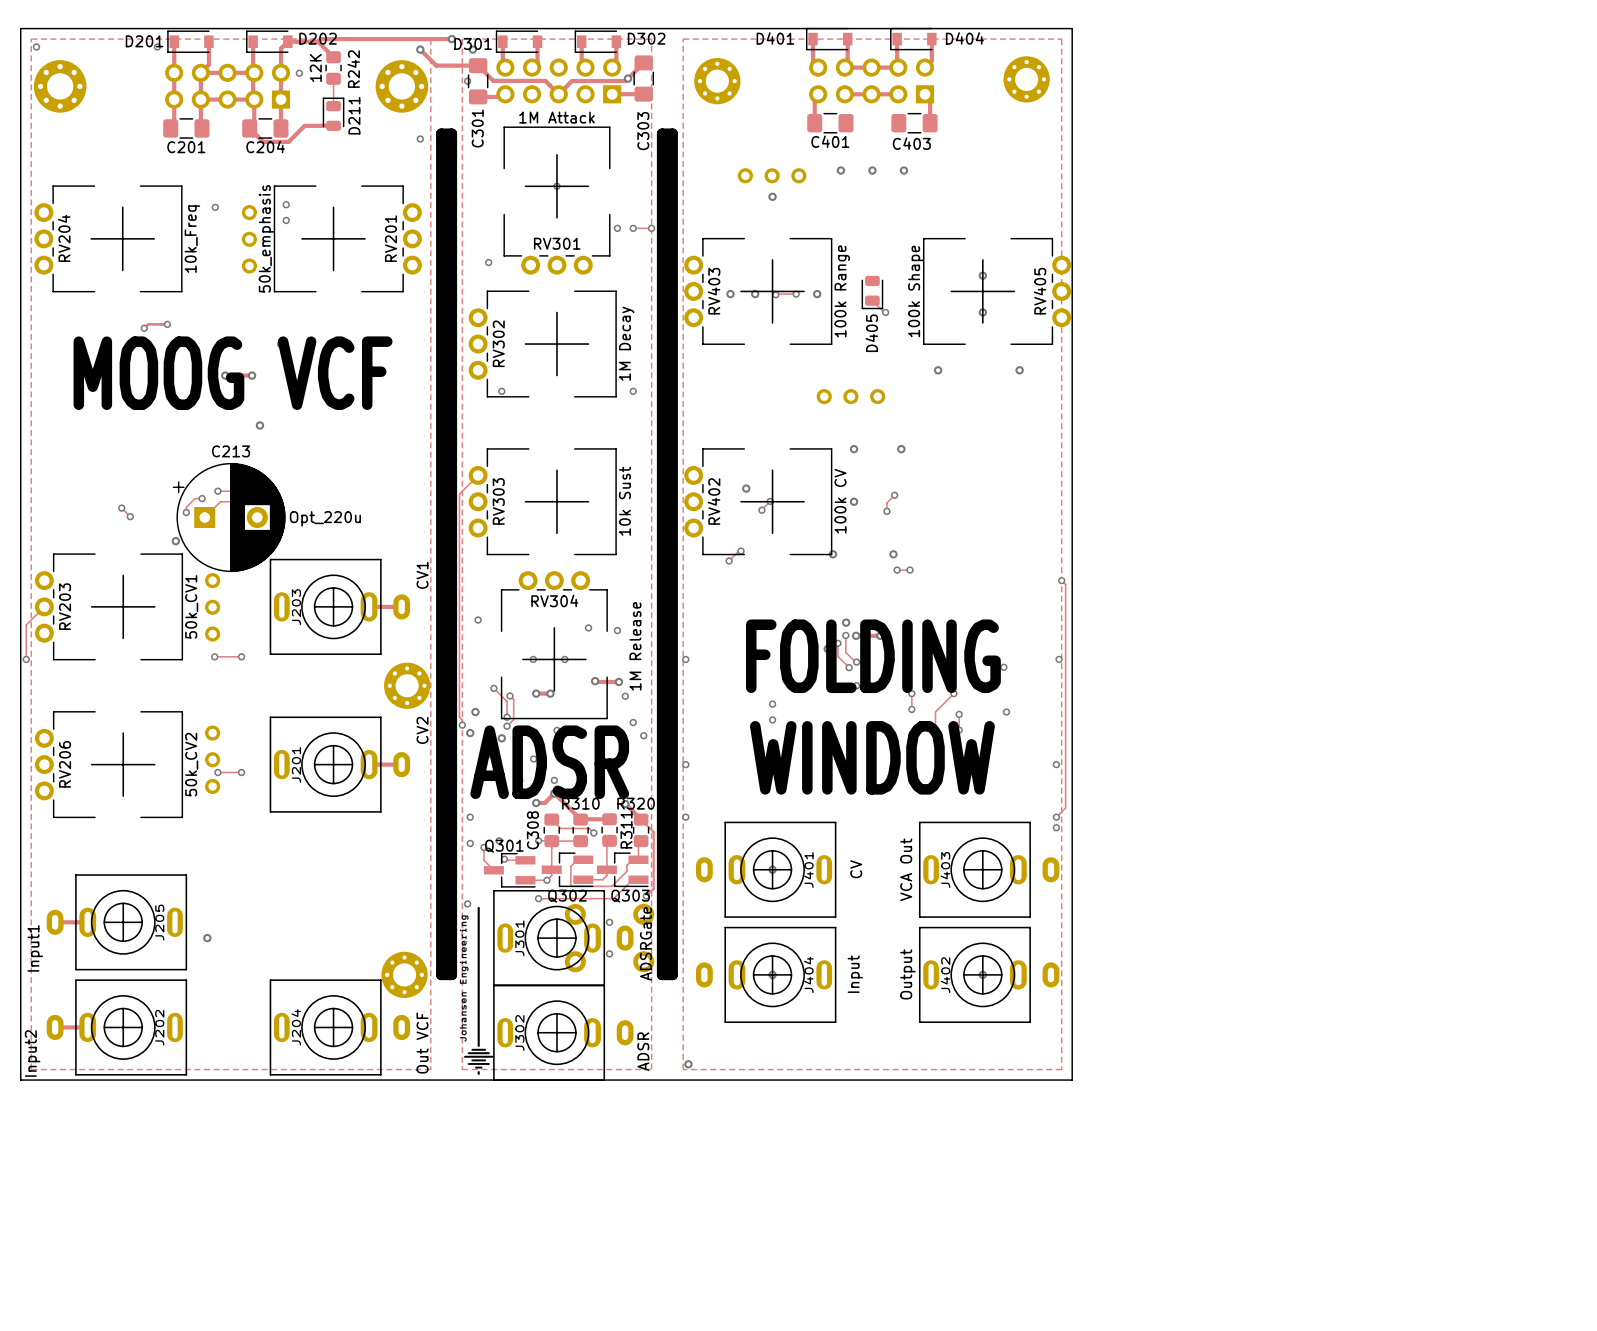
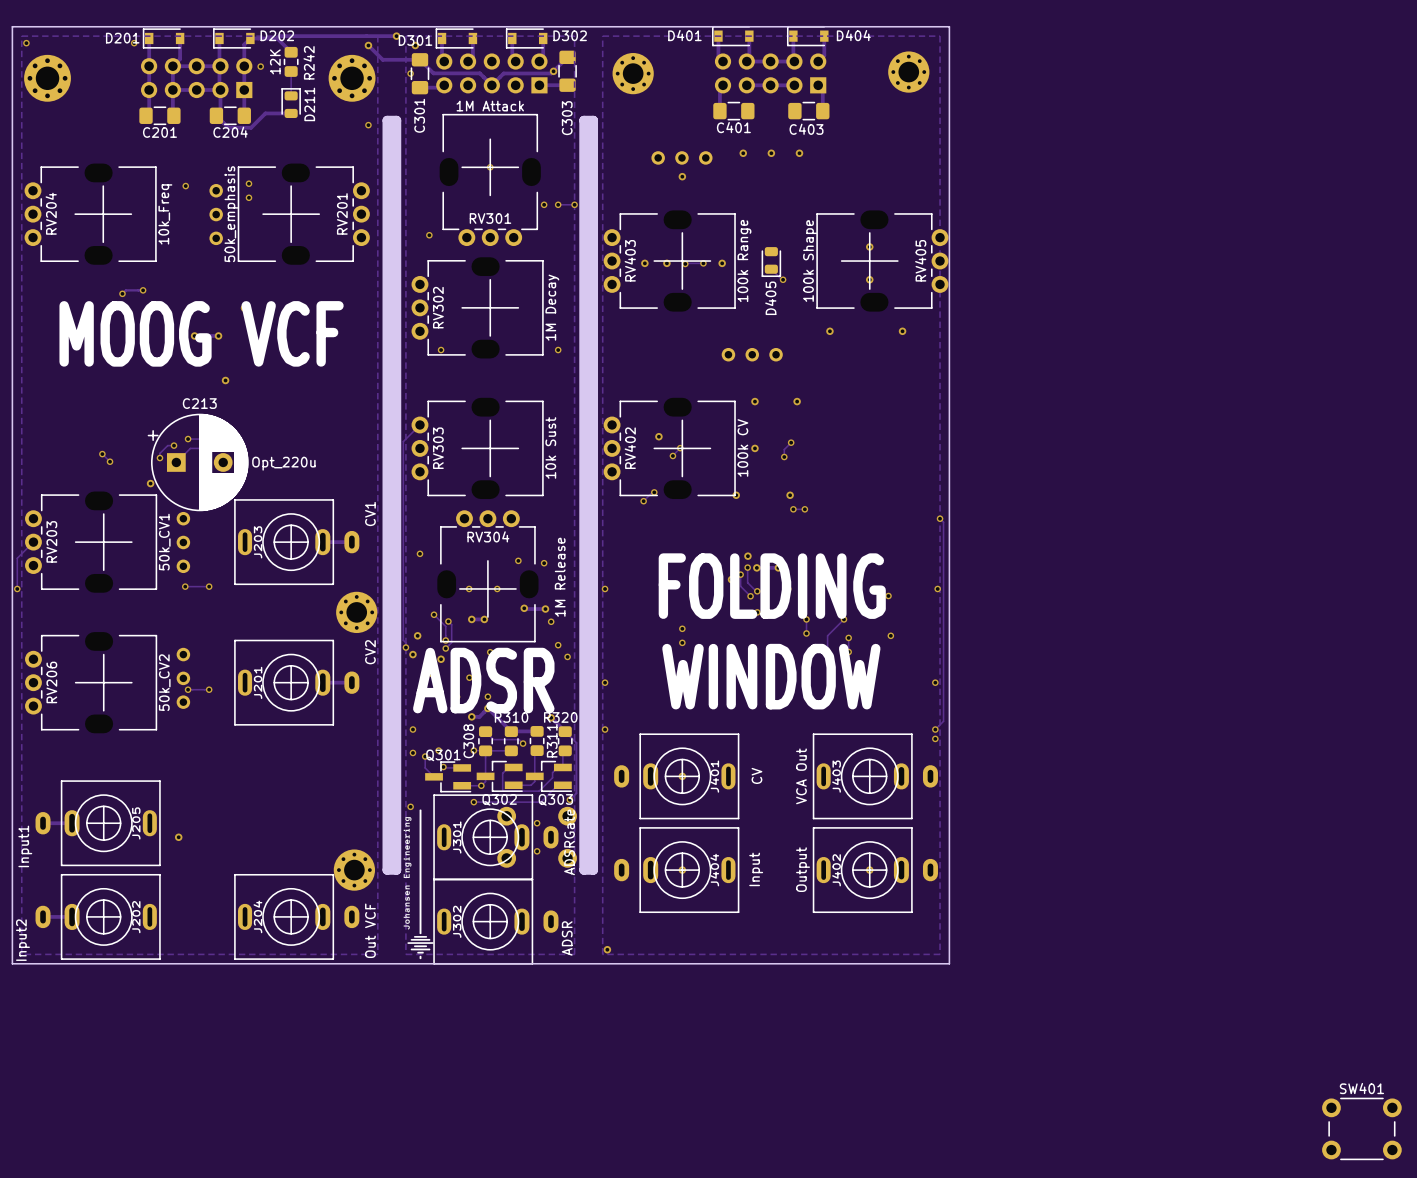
SW401: none -> (1361, 1128)

